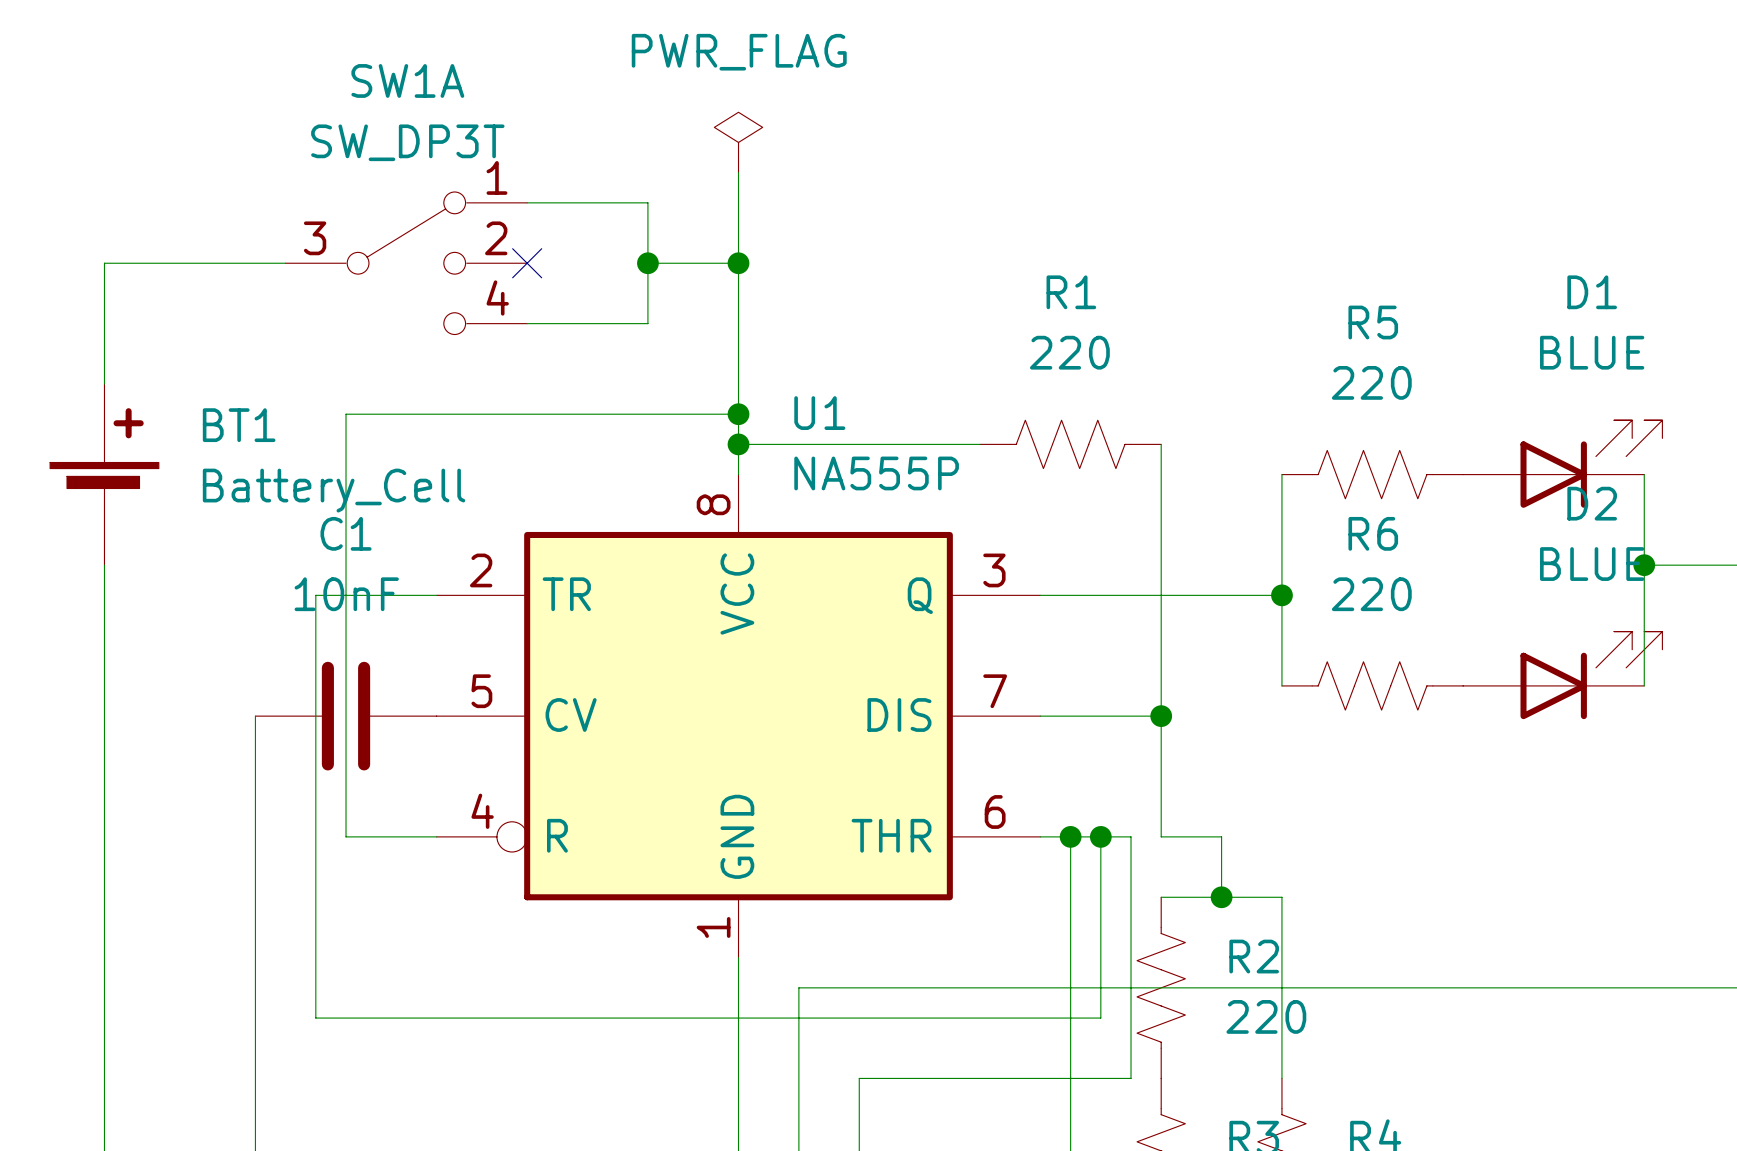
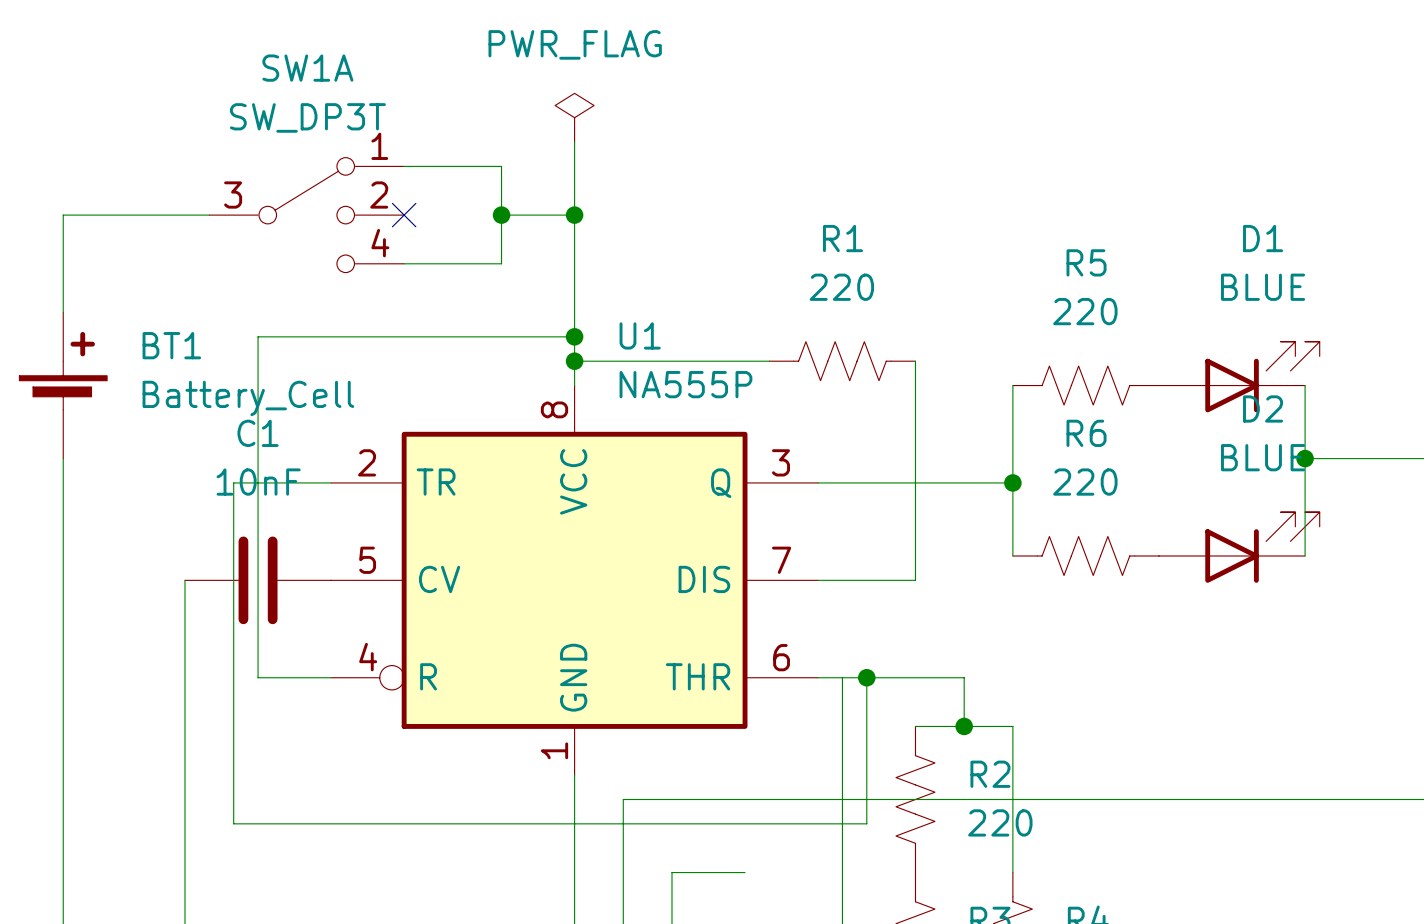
wire: (1161, 716) (1161, 836) -> (891, 677) (915, 677)
junction: (1161, 716) -> none
junction: (1070, 836) -> none
wire: (1131, 836) (1131, 1078) (949, 1078) -> none

